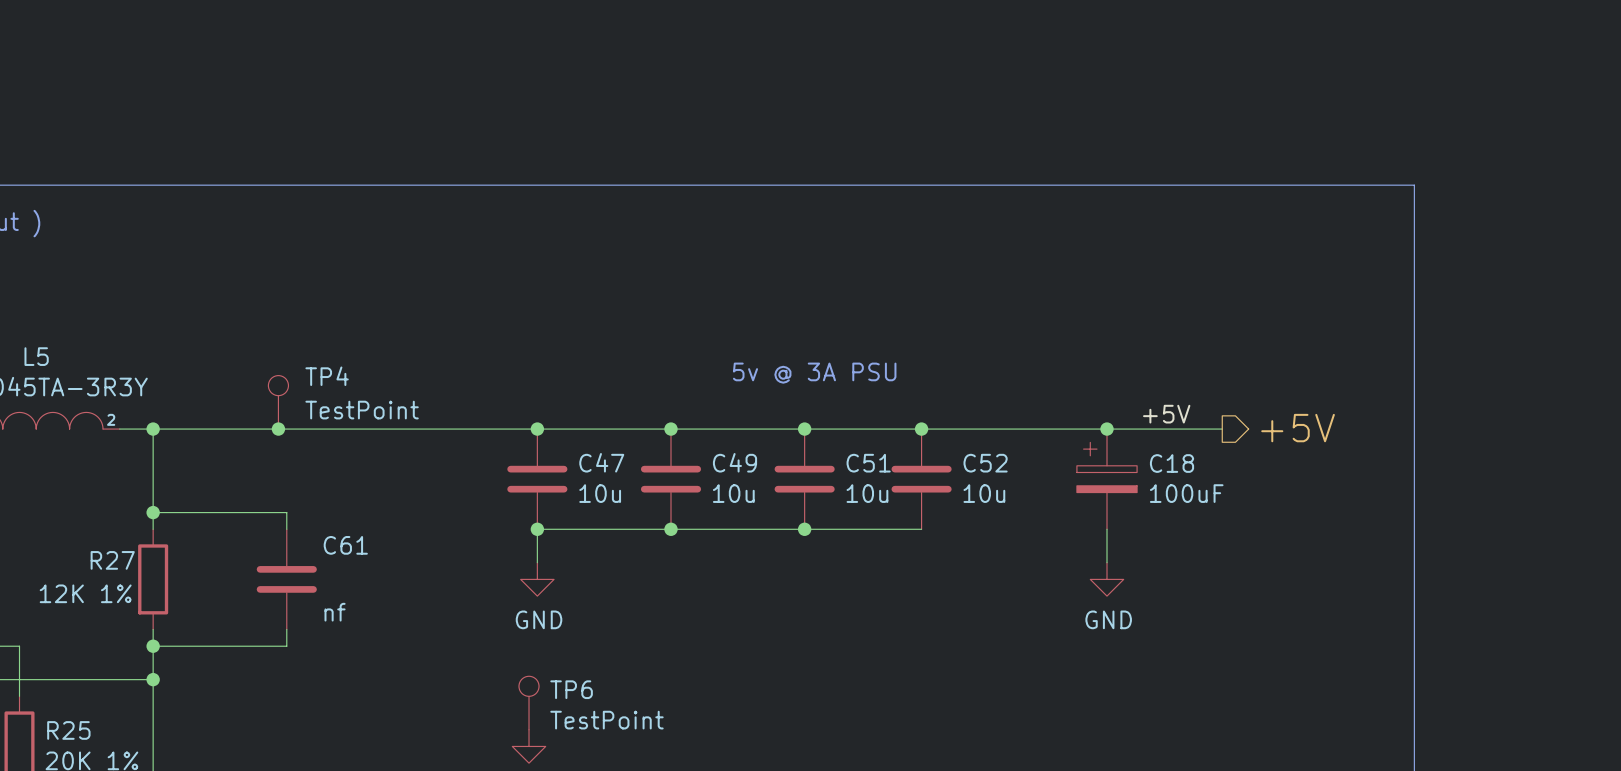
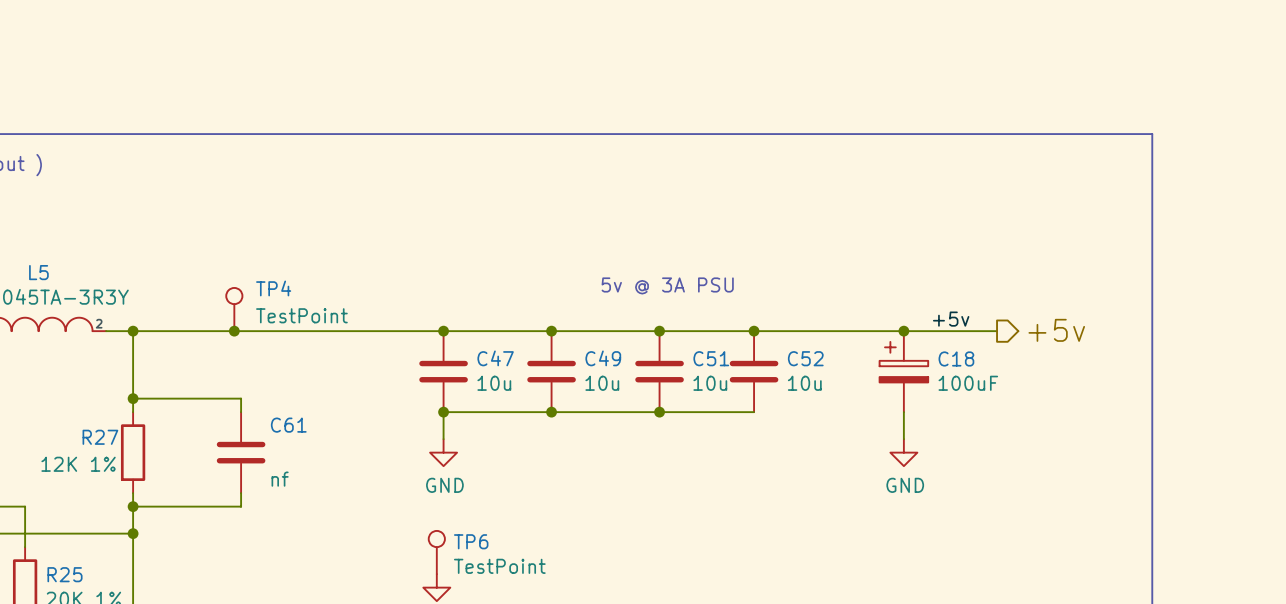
label: +5V (1166, 414) -> +5v (951, 319)
hierarchical label: +5V (1298, 428) -> +5v (1056, 330)

